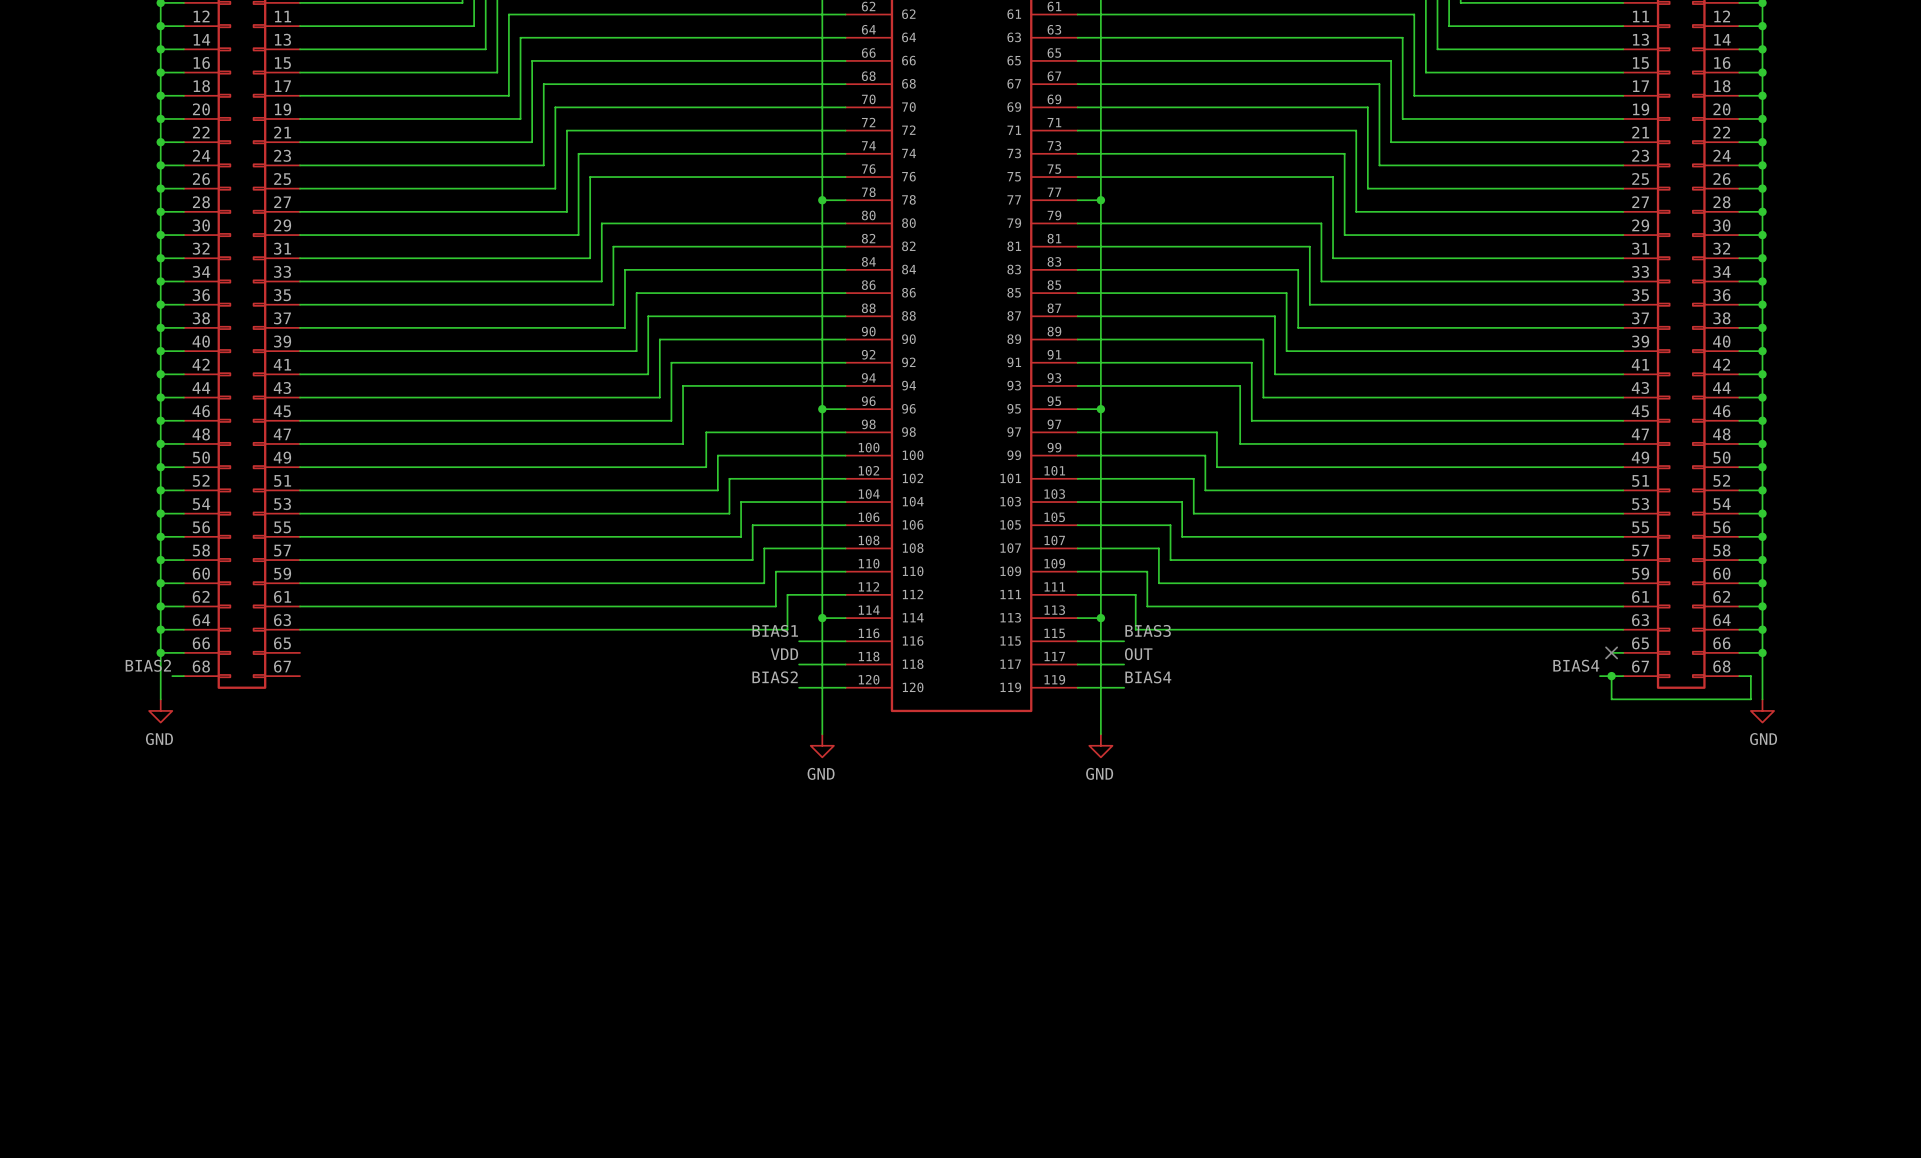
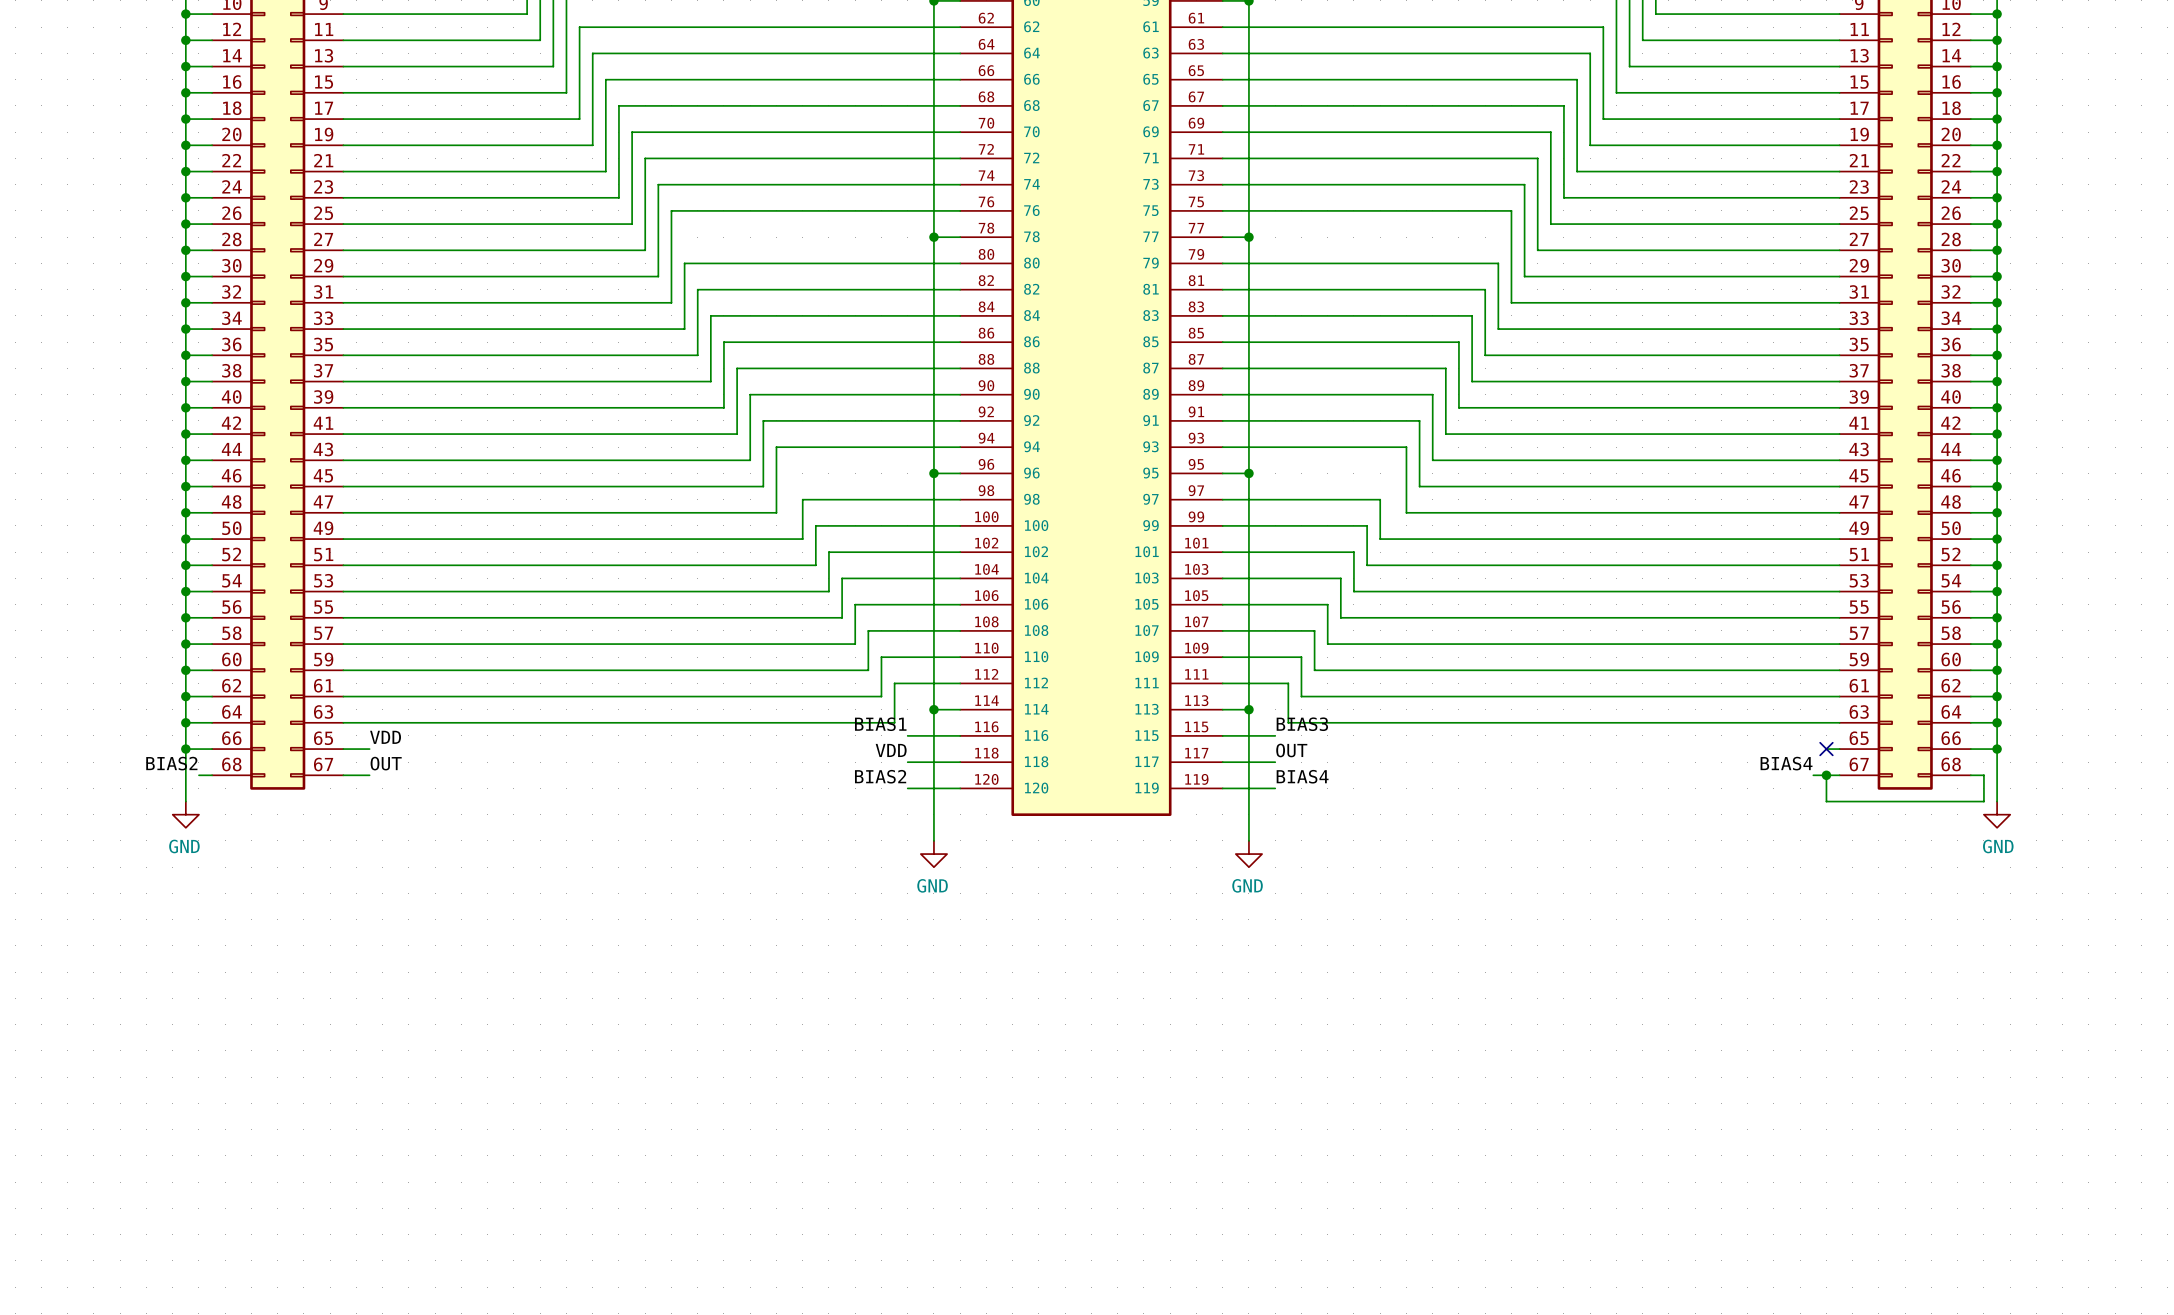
label: none -> VDD (385, 737)
wire: none -> (343, 749) (369, 749)
label: none -> OUT (386, 763)
wire: none -> (343, 775) (369, 775)

